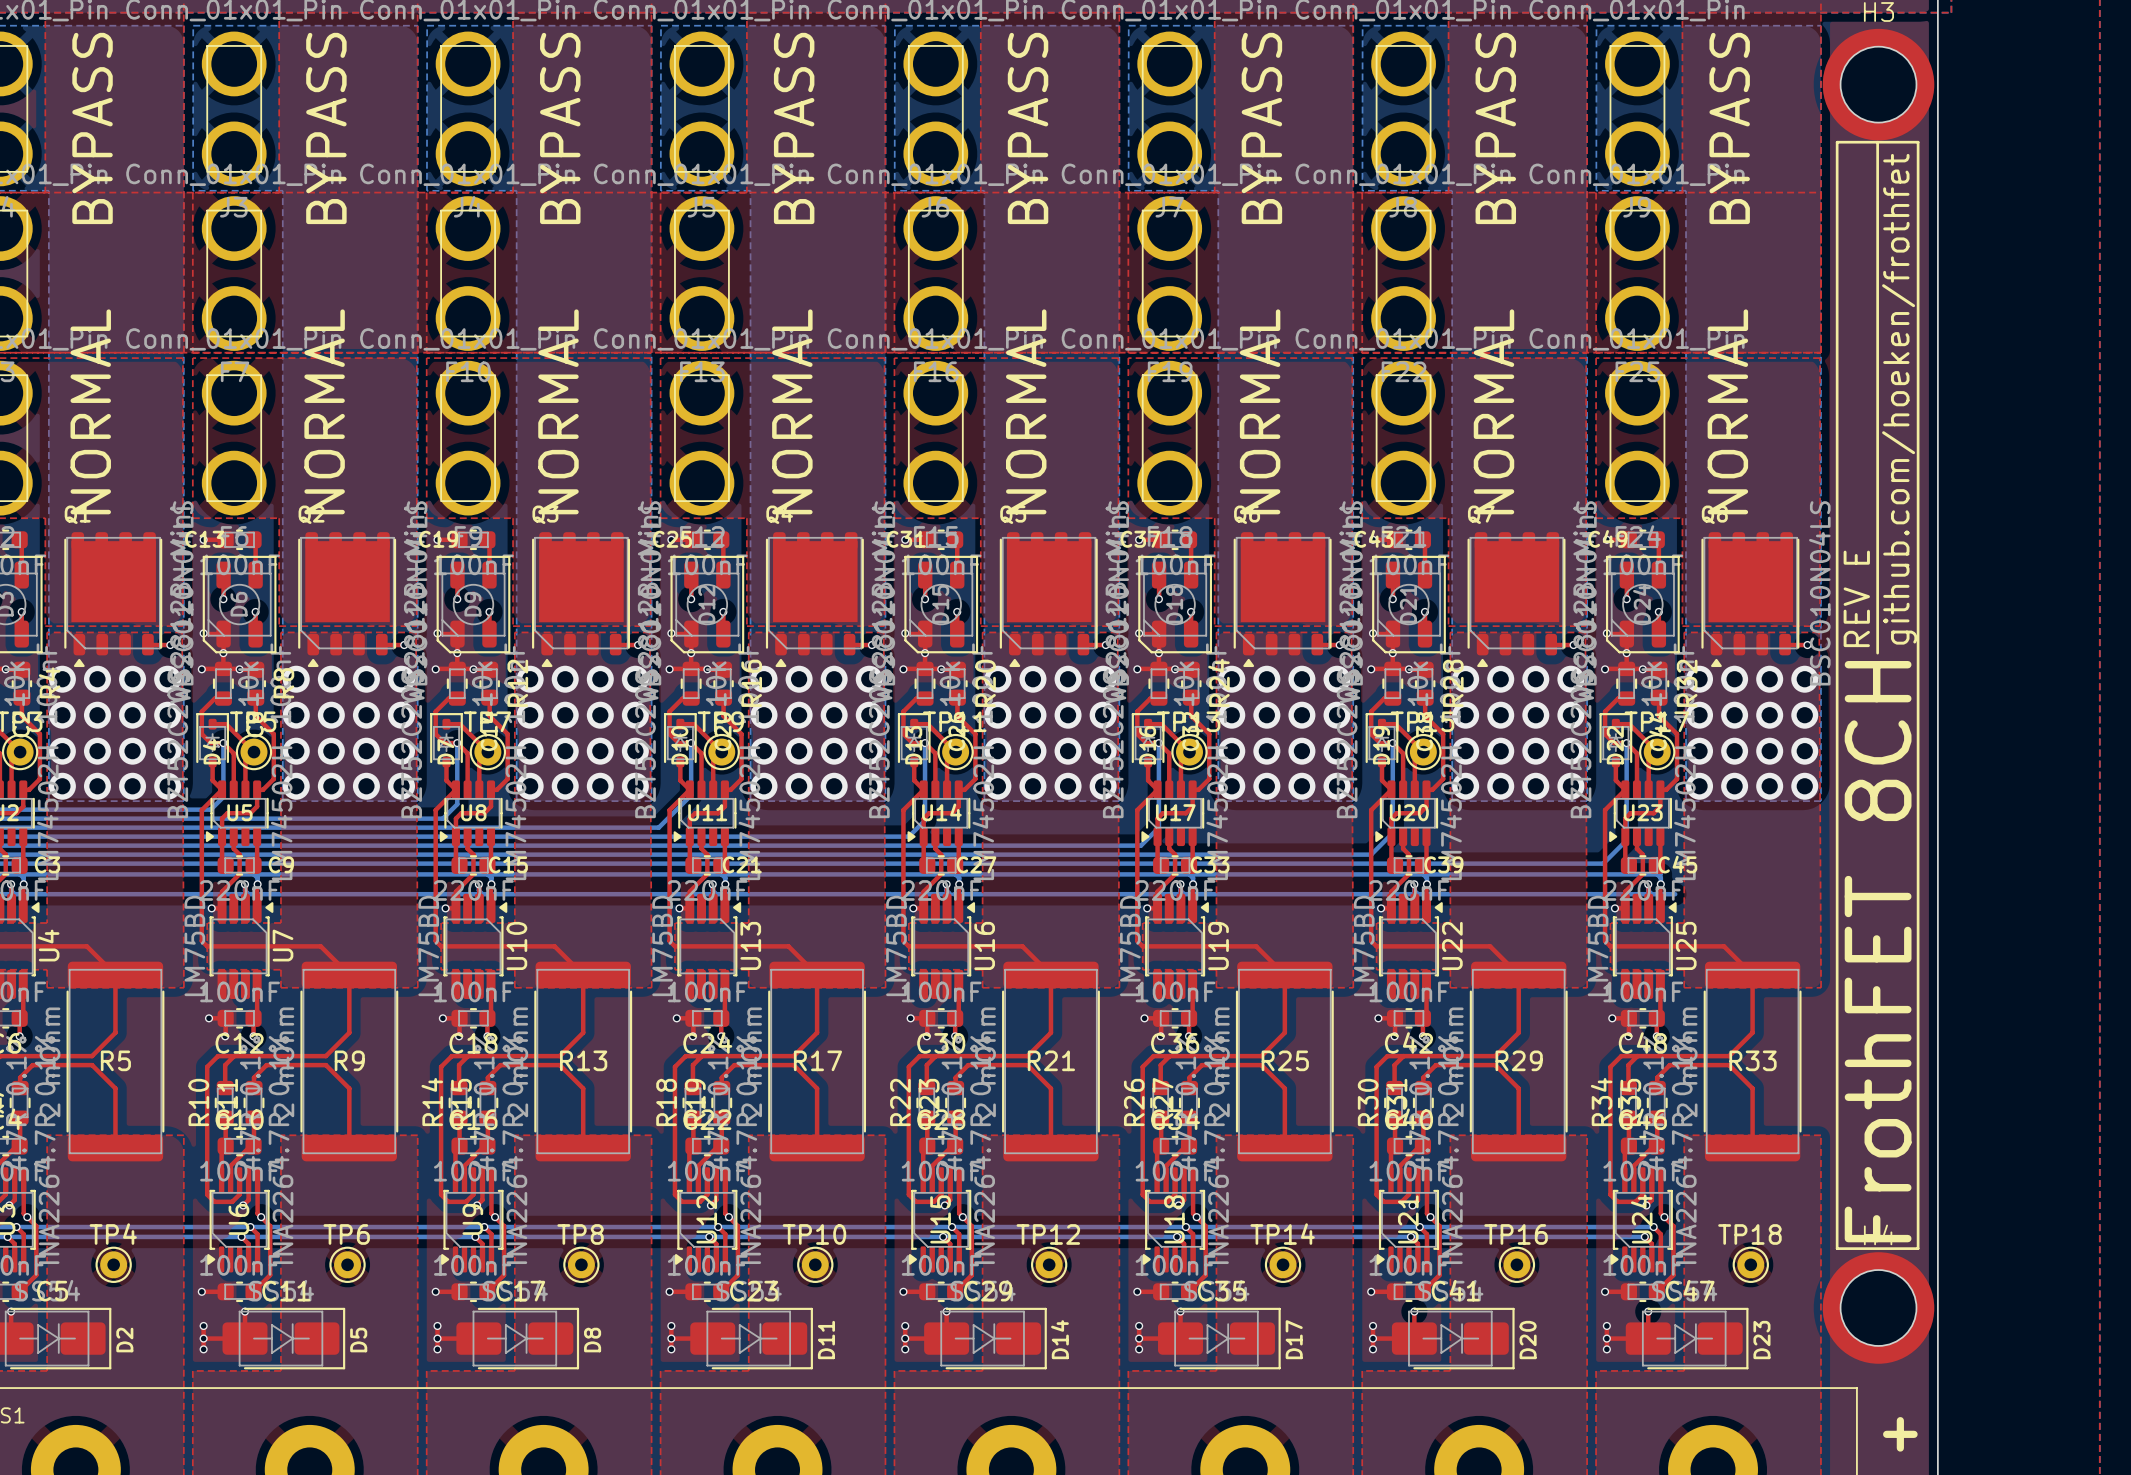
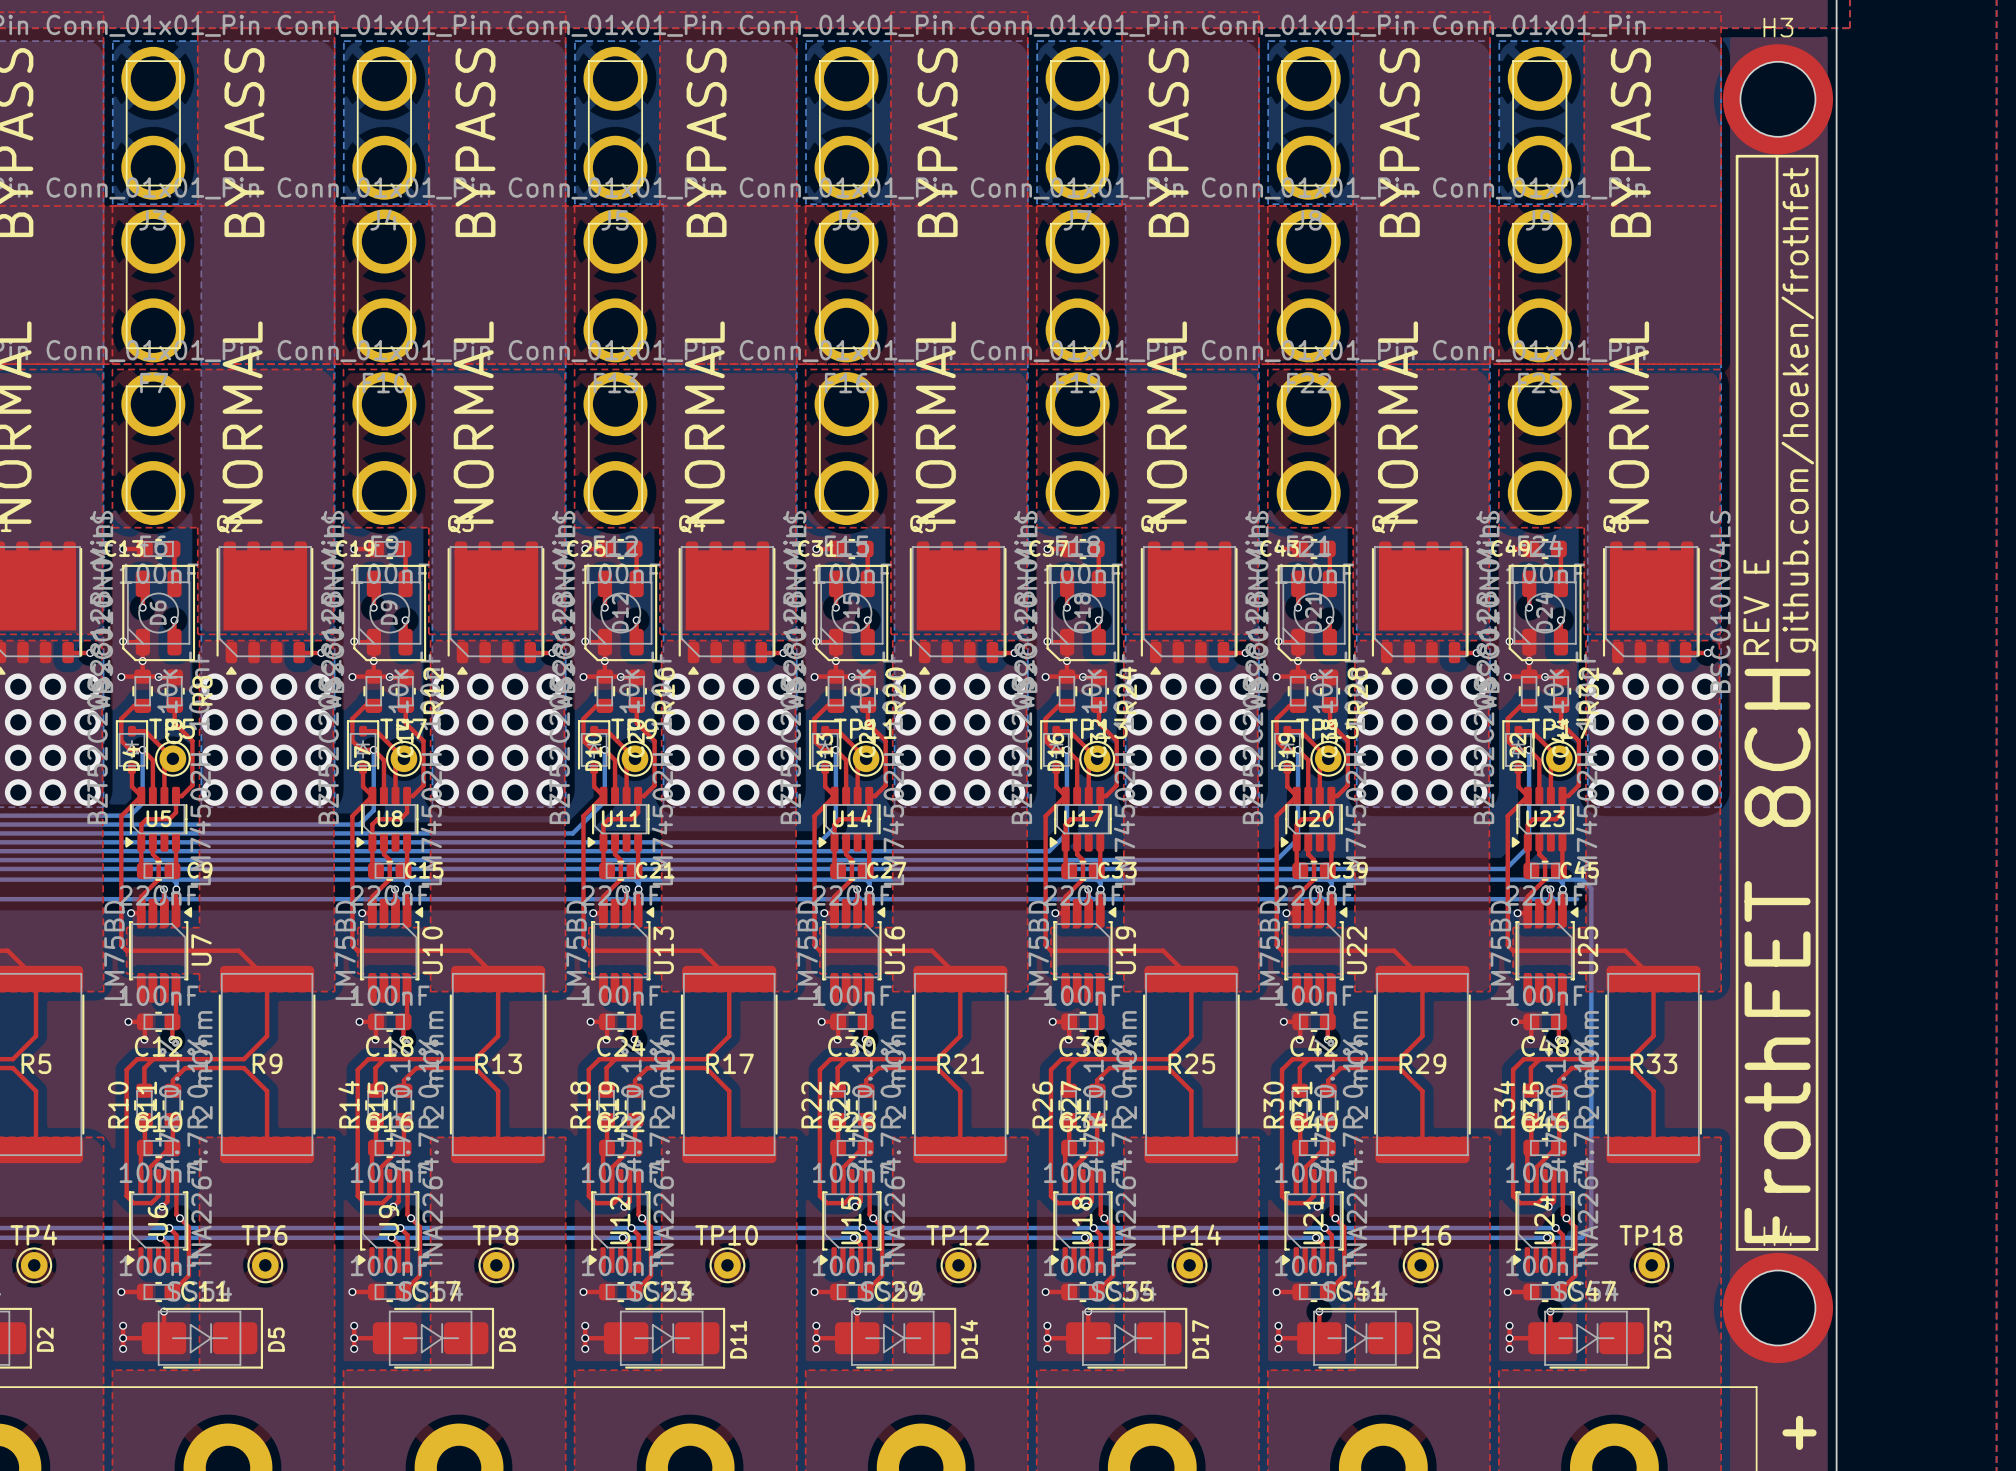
bottom track: none -> (1562, 879) (1582, 879) (1591, 888) (1591, 1228) (1581, 1237) (1547, 1237)

